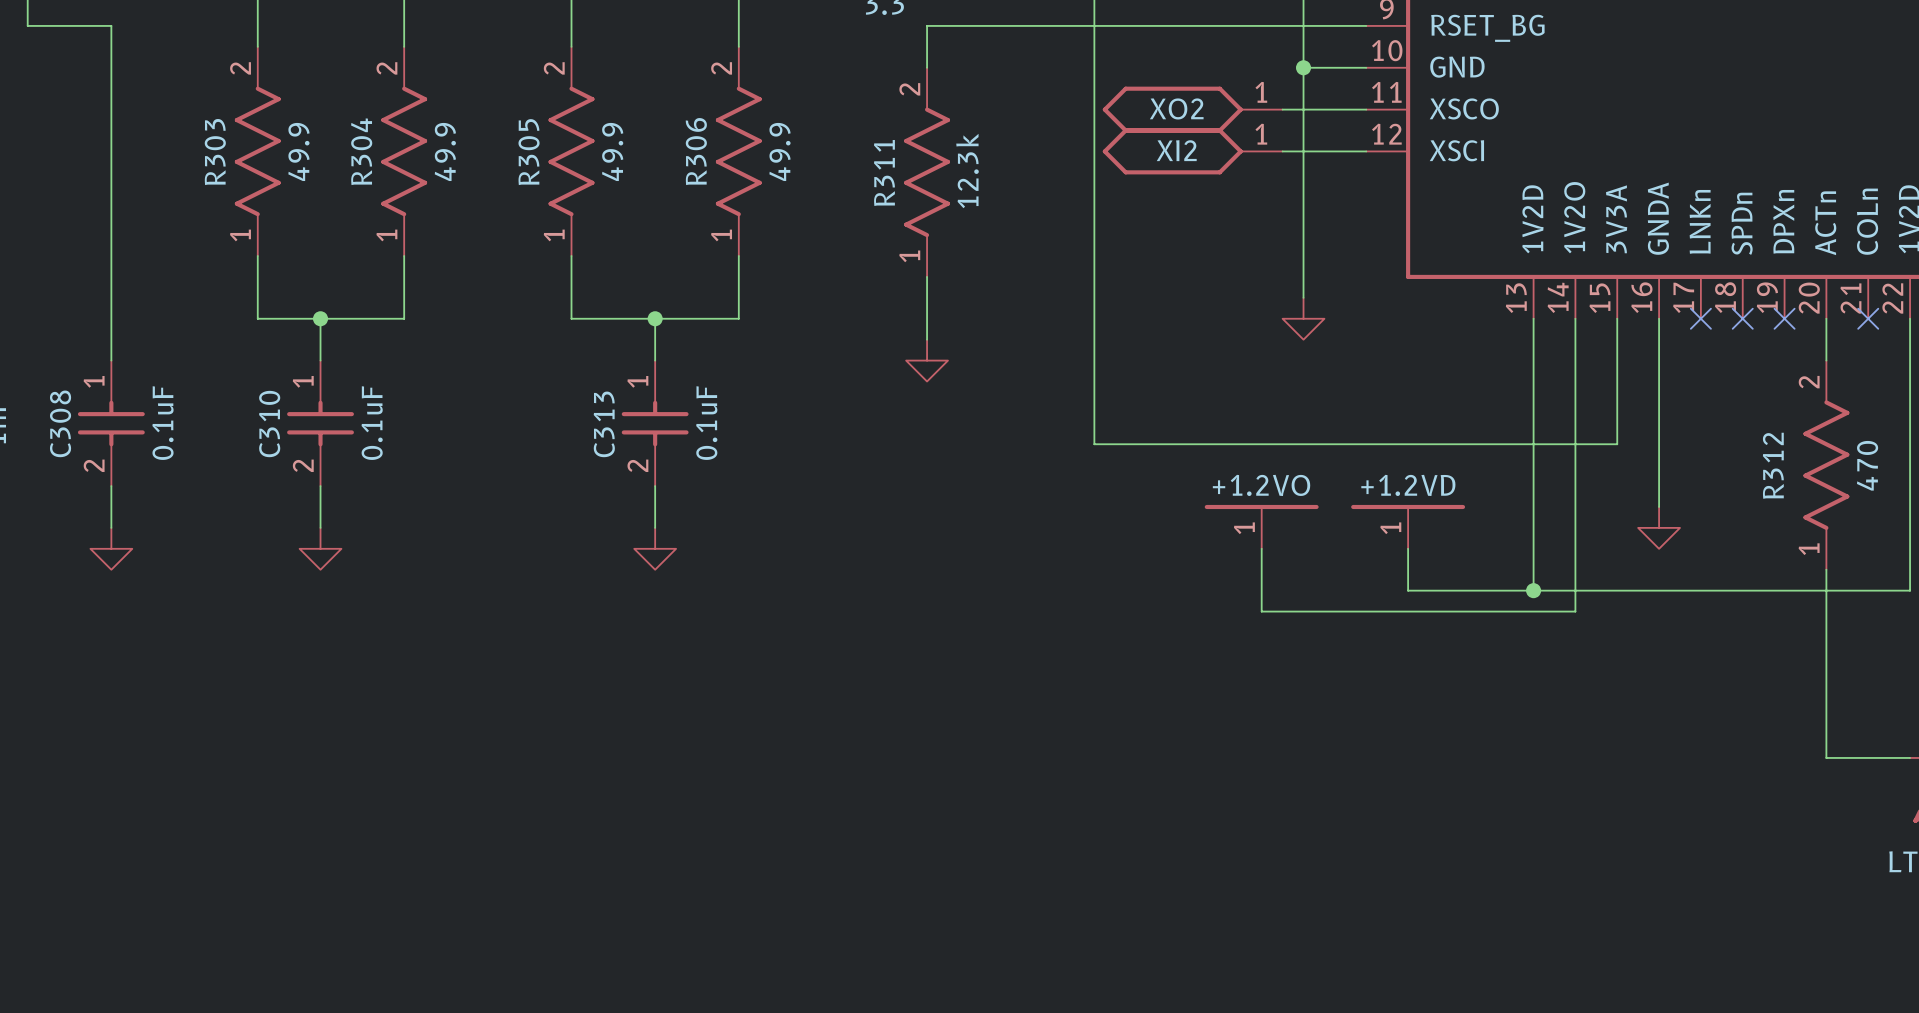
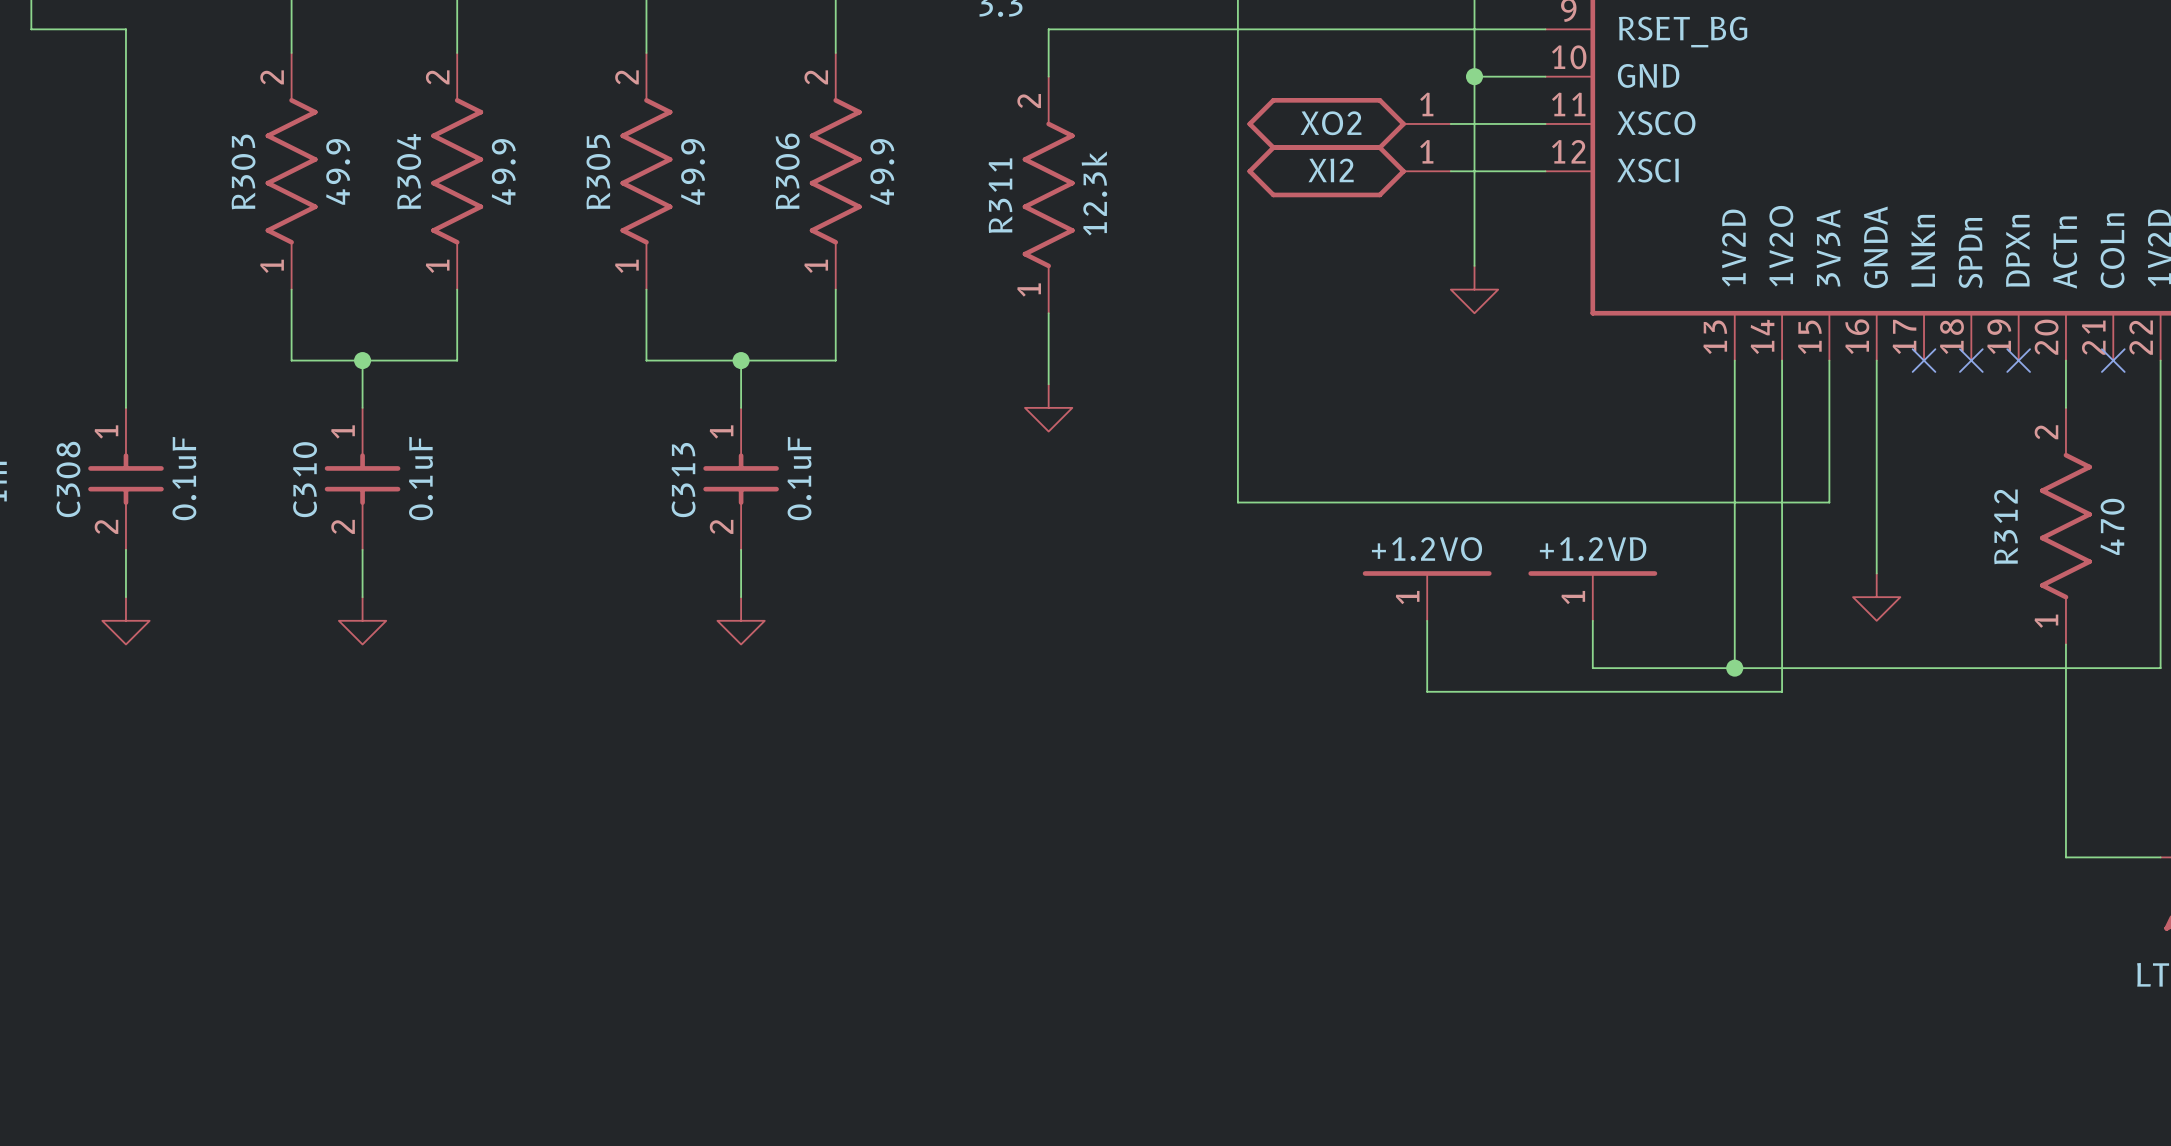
wire: (1303, 235) (1303, 297) -> none
power symbol position: (1303, 318) -> (1474, 289)

